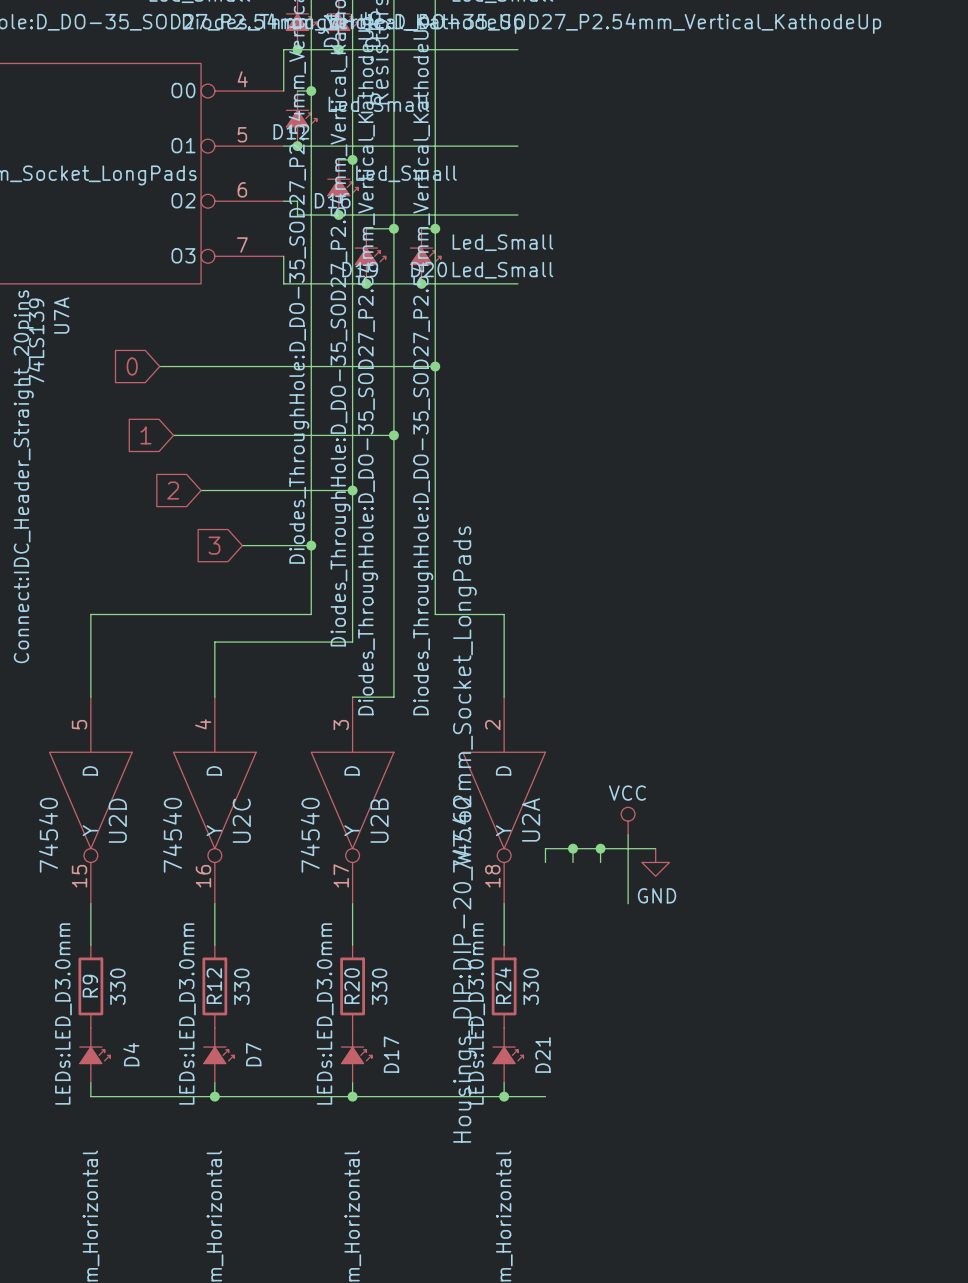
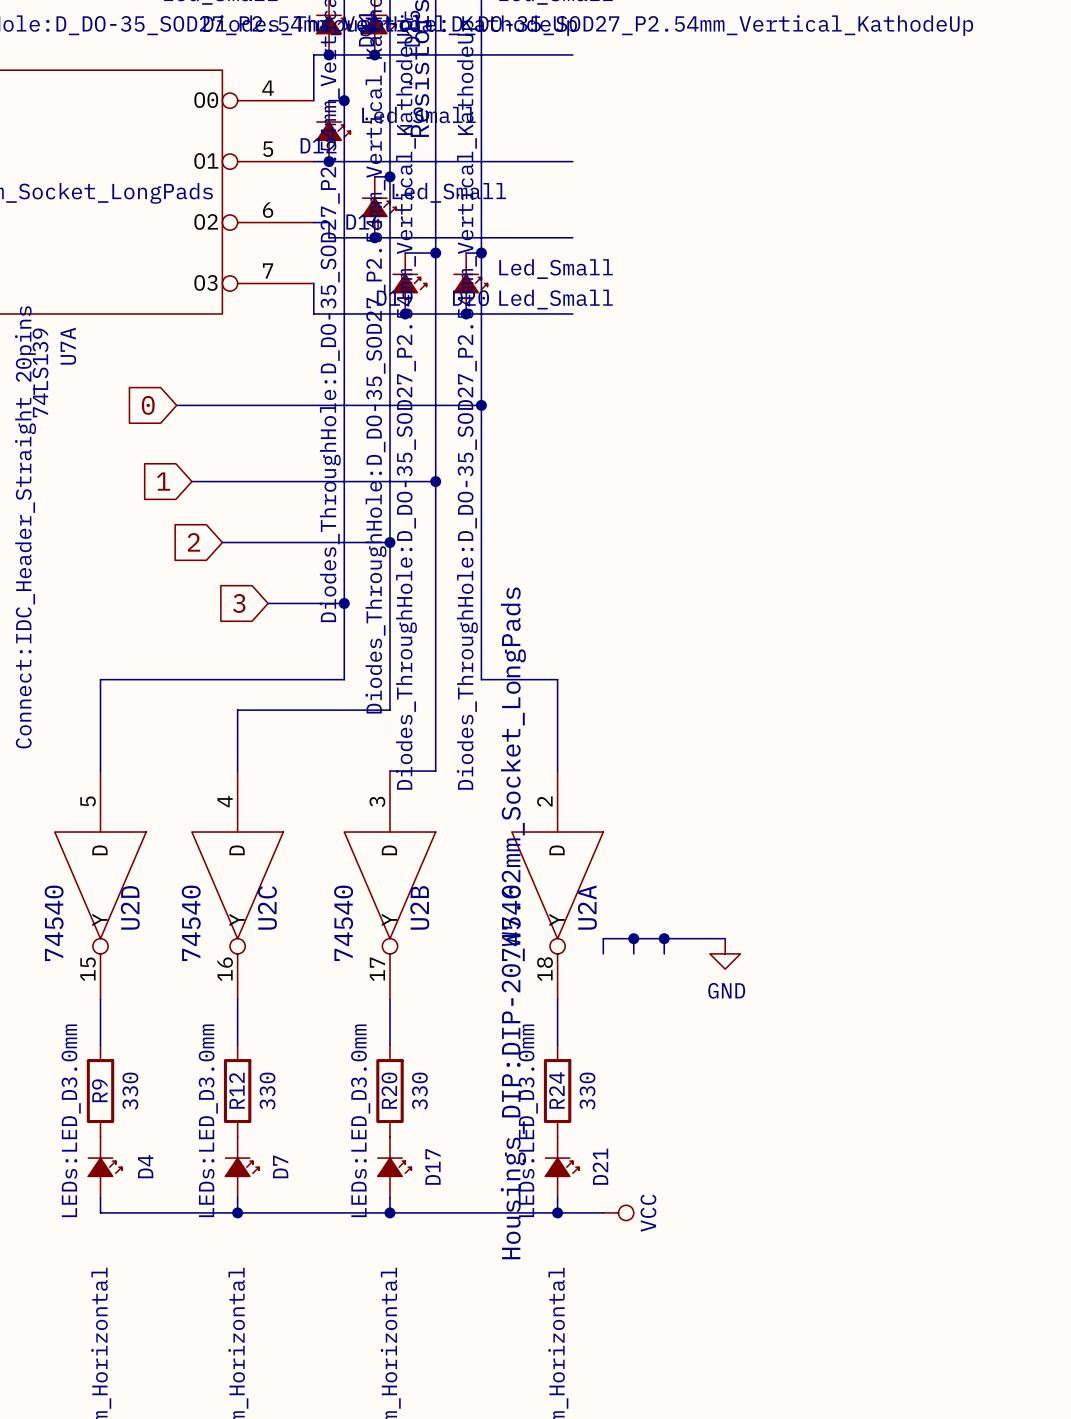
power symbol: VCC (628, 821) -> none
wire: (628, 834) (628, 903) -> none
power symbol: none -> VCC (618, 1212)

